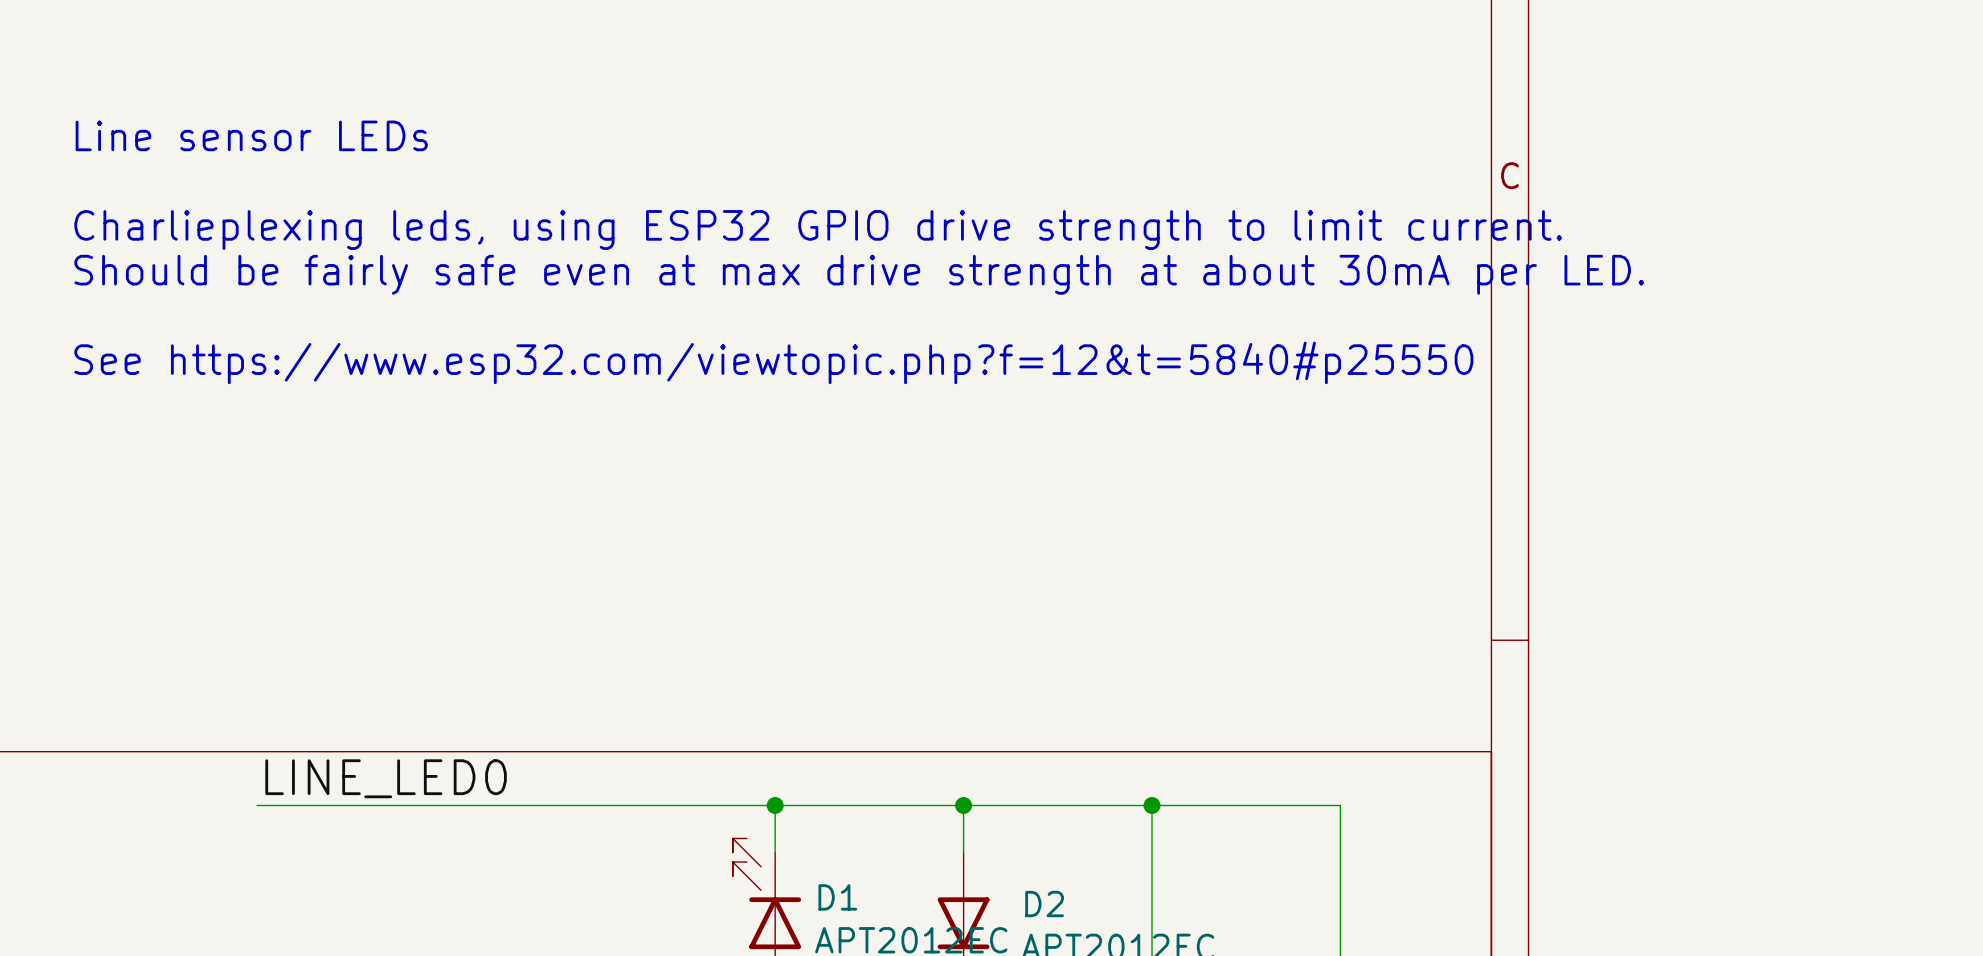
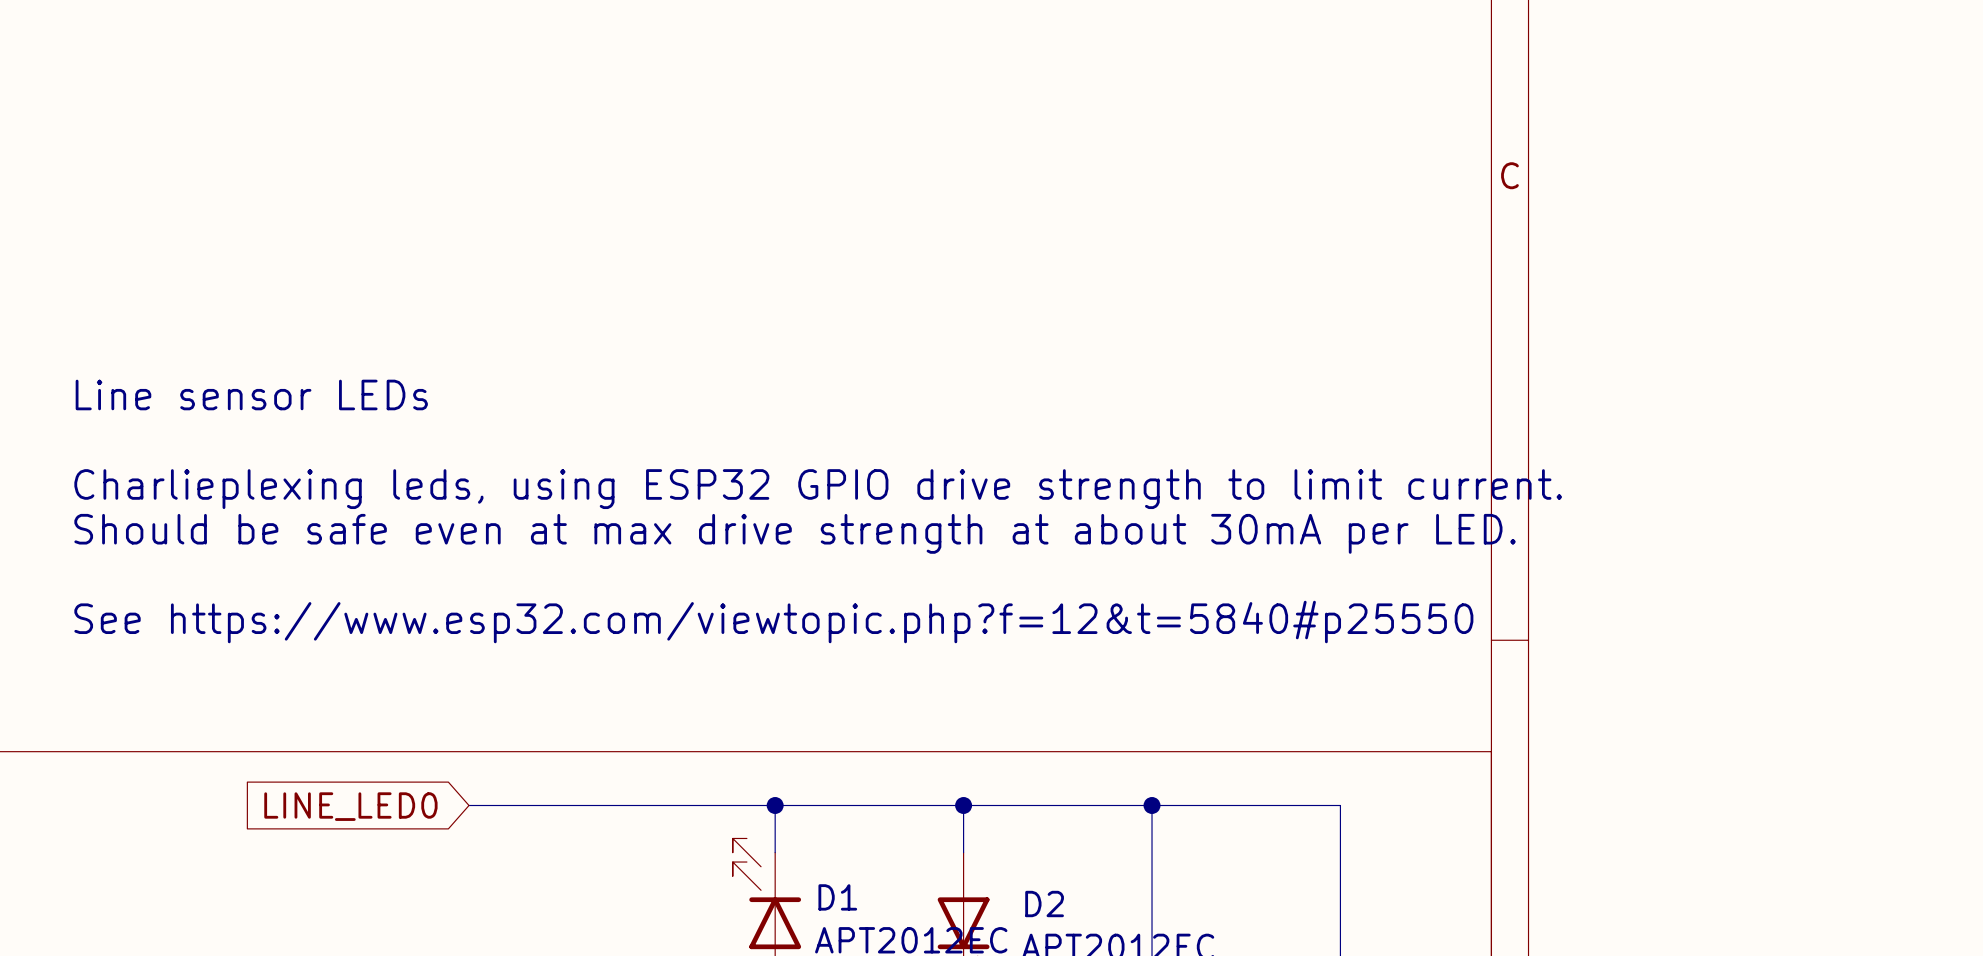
text position: Line sensor LEDs (251, 135) -> Line sensor LEDs (251, 394)
text position: Charlieplexing leds, using ESP32 GPIO drive strength to limit current. (818, 230) -> Charlieplexing leds, using ESP32 GPIO drive strength to limit current. (818, 489)
text: Should be fairly safe even at max drive strength at about 30mA per LED. (859, 274) -> none
text position: See https://www.esp32.com/viewtopic.php?f=12&t=5840#p25550 (773, 362) -> See https://www.esp32.com/viewtopic.php?f=12&t=5840#p25550 (773, 622)
text: none -> Should be safe even at max drive strength at about 30mA per LED. (795, 533)
label: LINE_LED0 (386, 778) -> none
wire: (257, 805) (468, 805) -> none
global label: none -> LINE_LED0 (350, 806)

